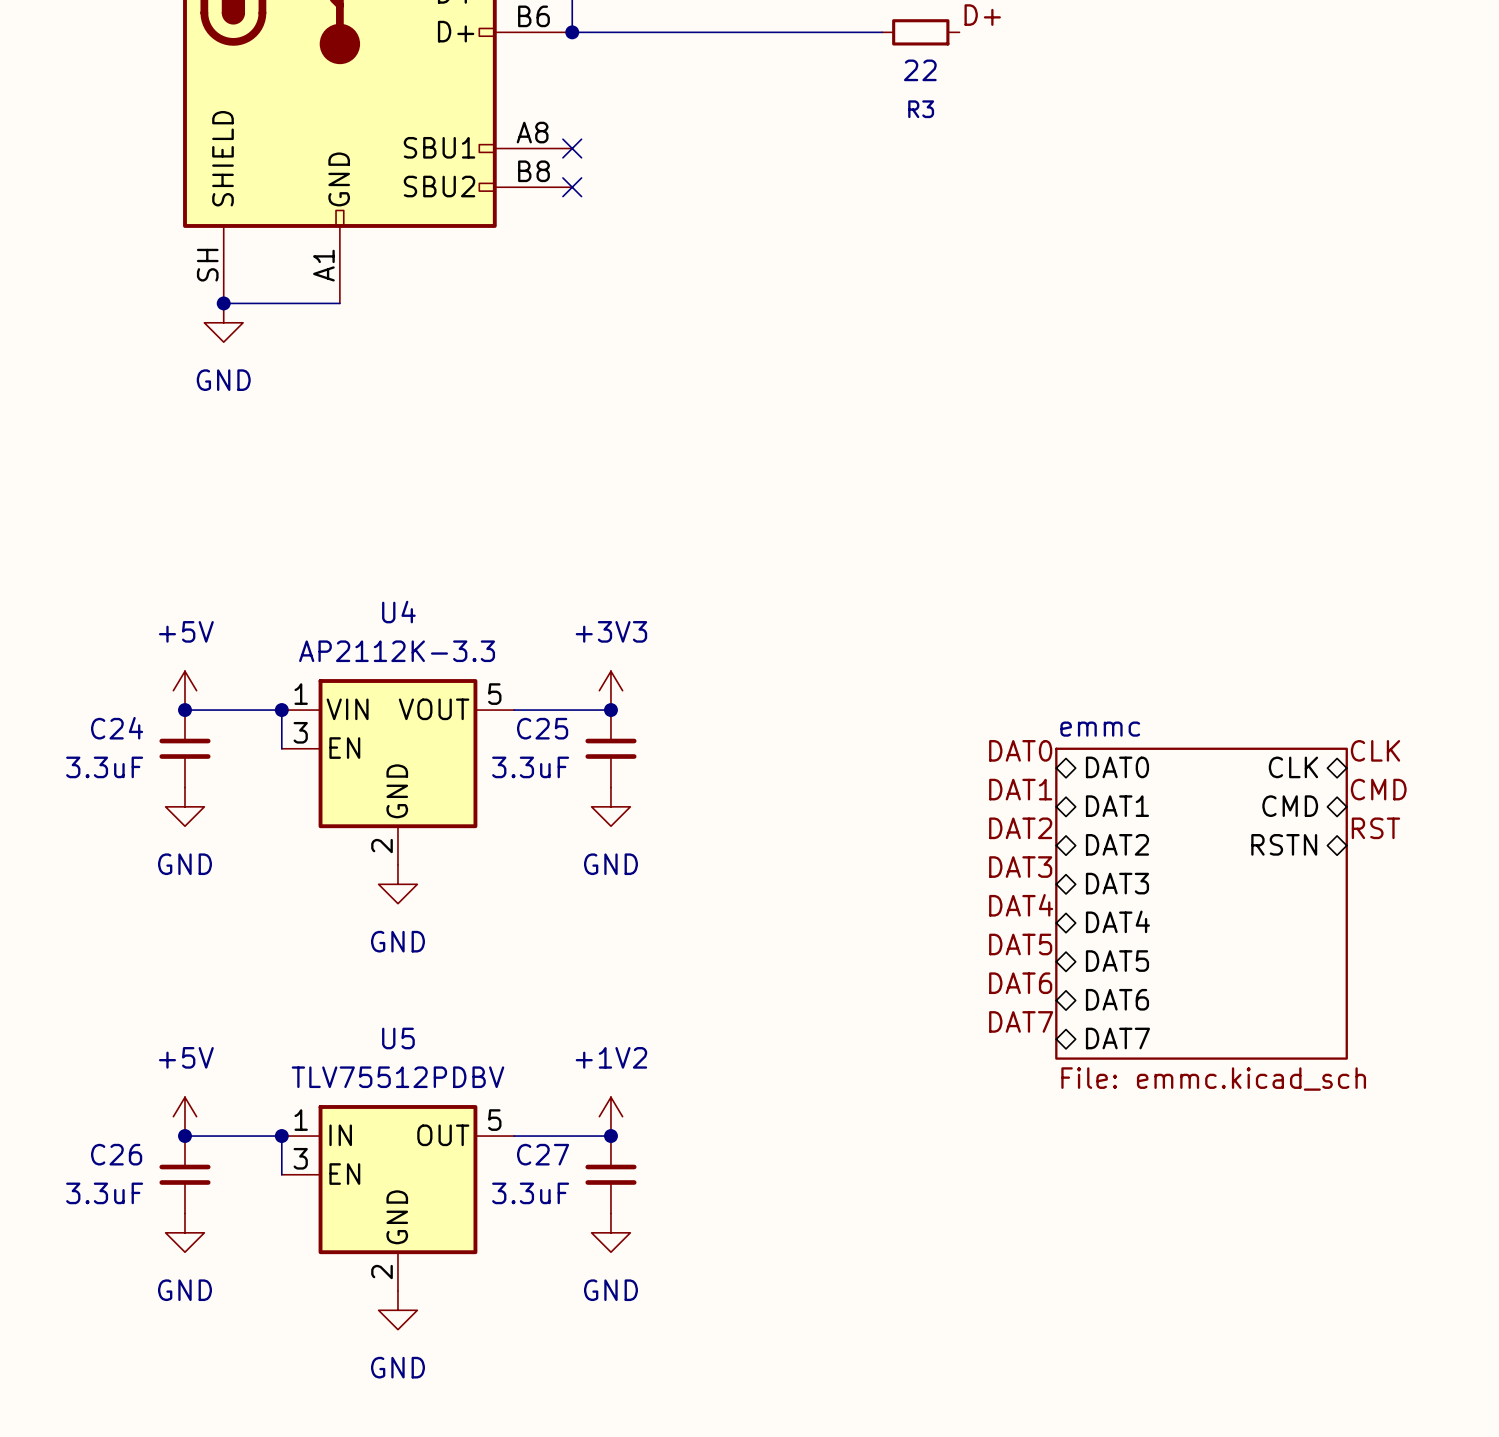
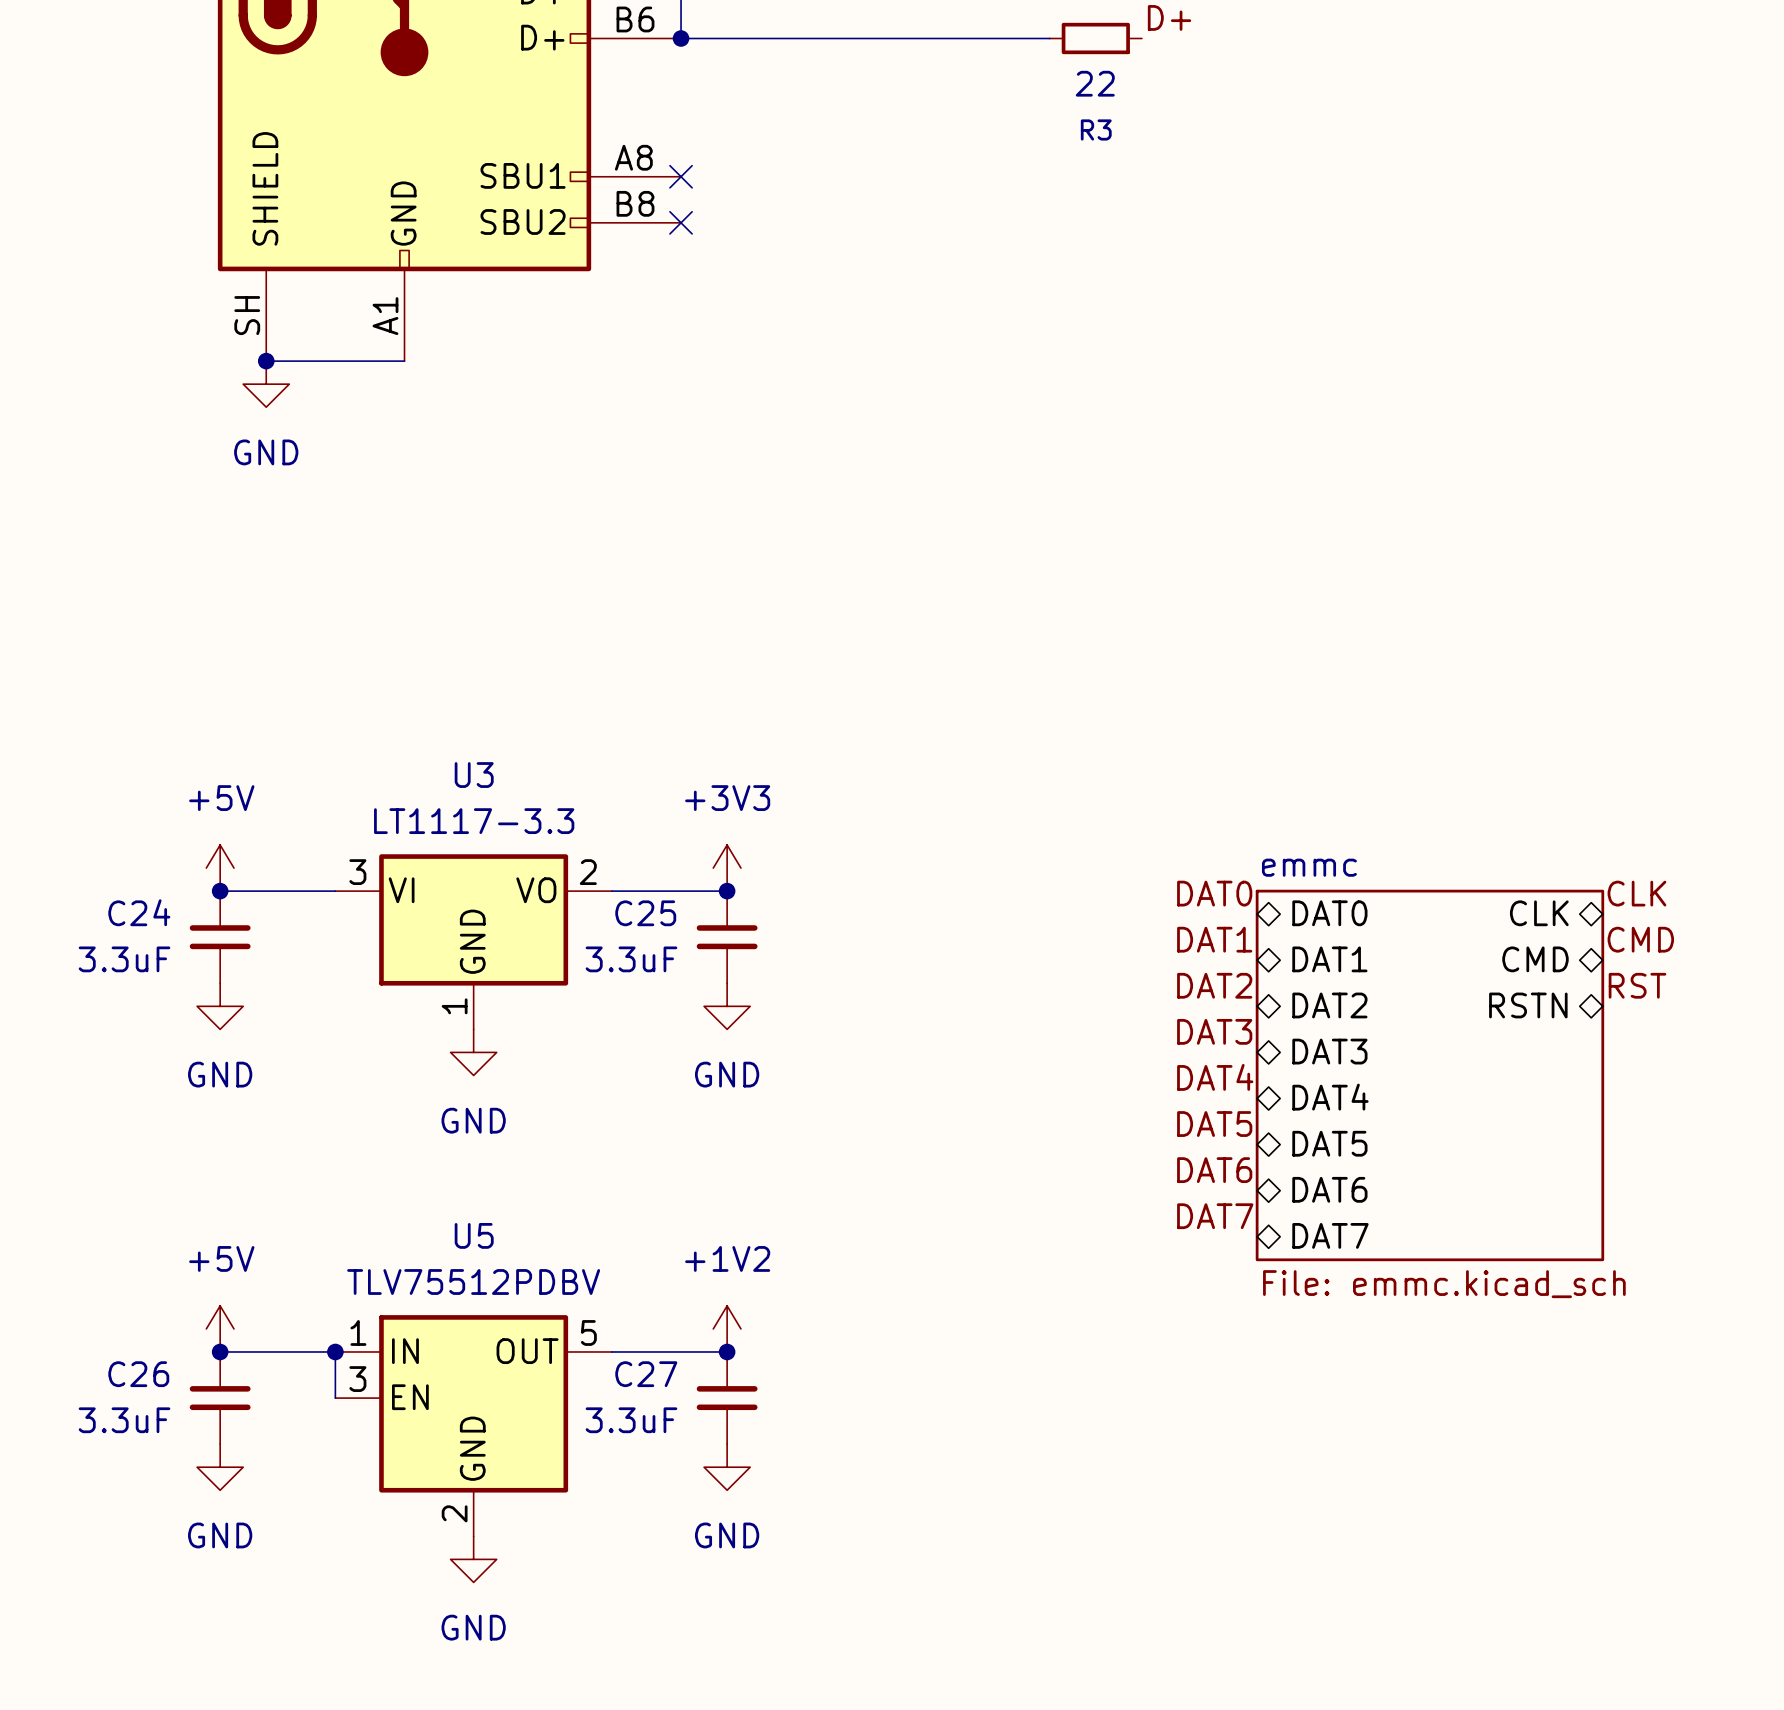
power symbol position: +5V (184, 690) -> +5V (220, 868)
power symbol position: +3V3 (610, 690) -> +3V3 (727, 868)
wire: (184, 710) (281, 710) (281, 748) -> (220, 891) (335, 891)
junction position: (184, 710) -> (220, 891)
junction: (281, 710) -> none
wire: (514, 710) (610, 710) -> (611, 891) (727, 891)
junction position: (610, 710) -> (727, 891)
C24 position: (184, 748) -> (220, 937)
C25 position: (610, 748) -> (727, 937)
U4: AP2112K-3.3 (397, 772) -> none
U3: none -> LT1117-3.3 (473, 941)
power symbol position: GND (184, 806) -> GND (220, 1006)
power symbol position: GND (610, 806) -> GND (727, 1006)

